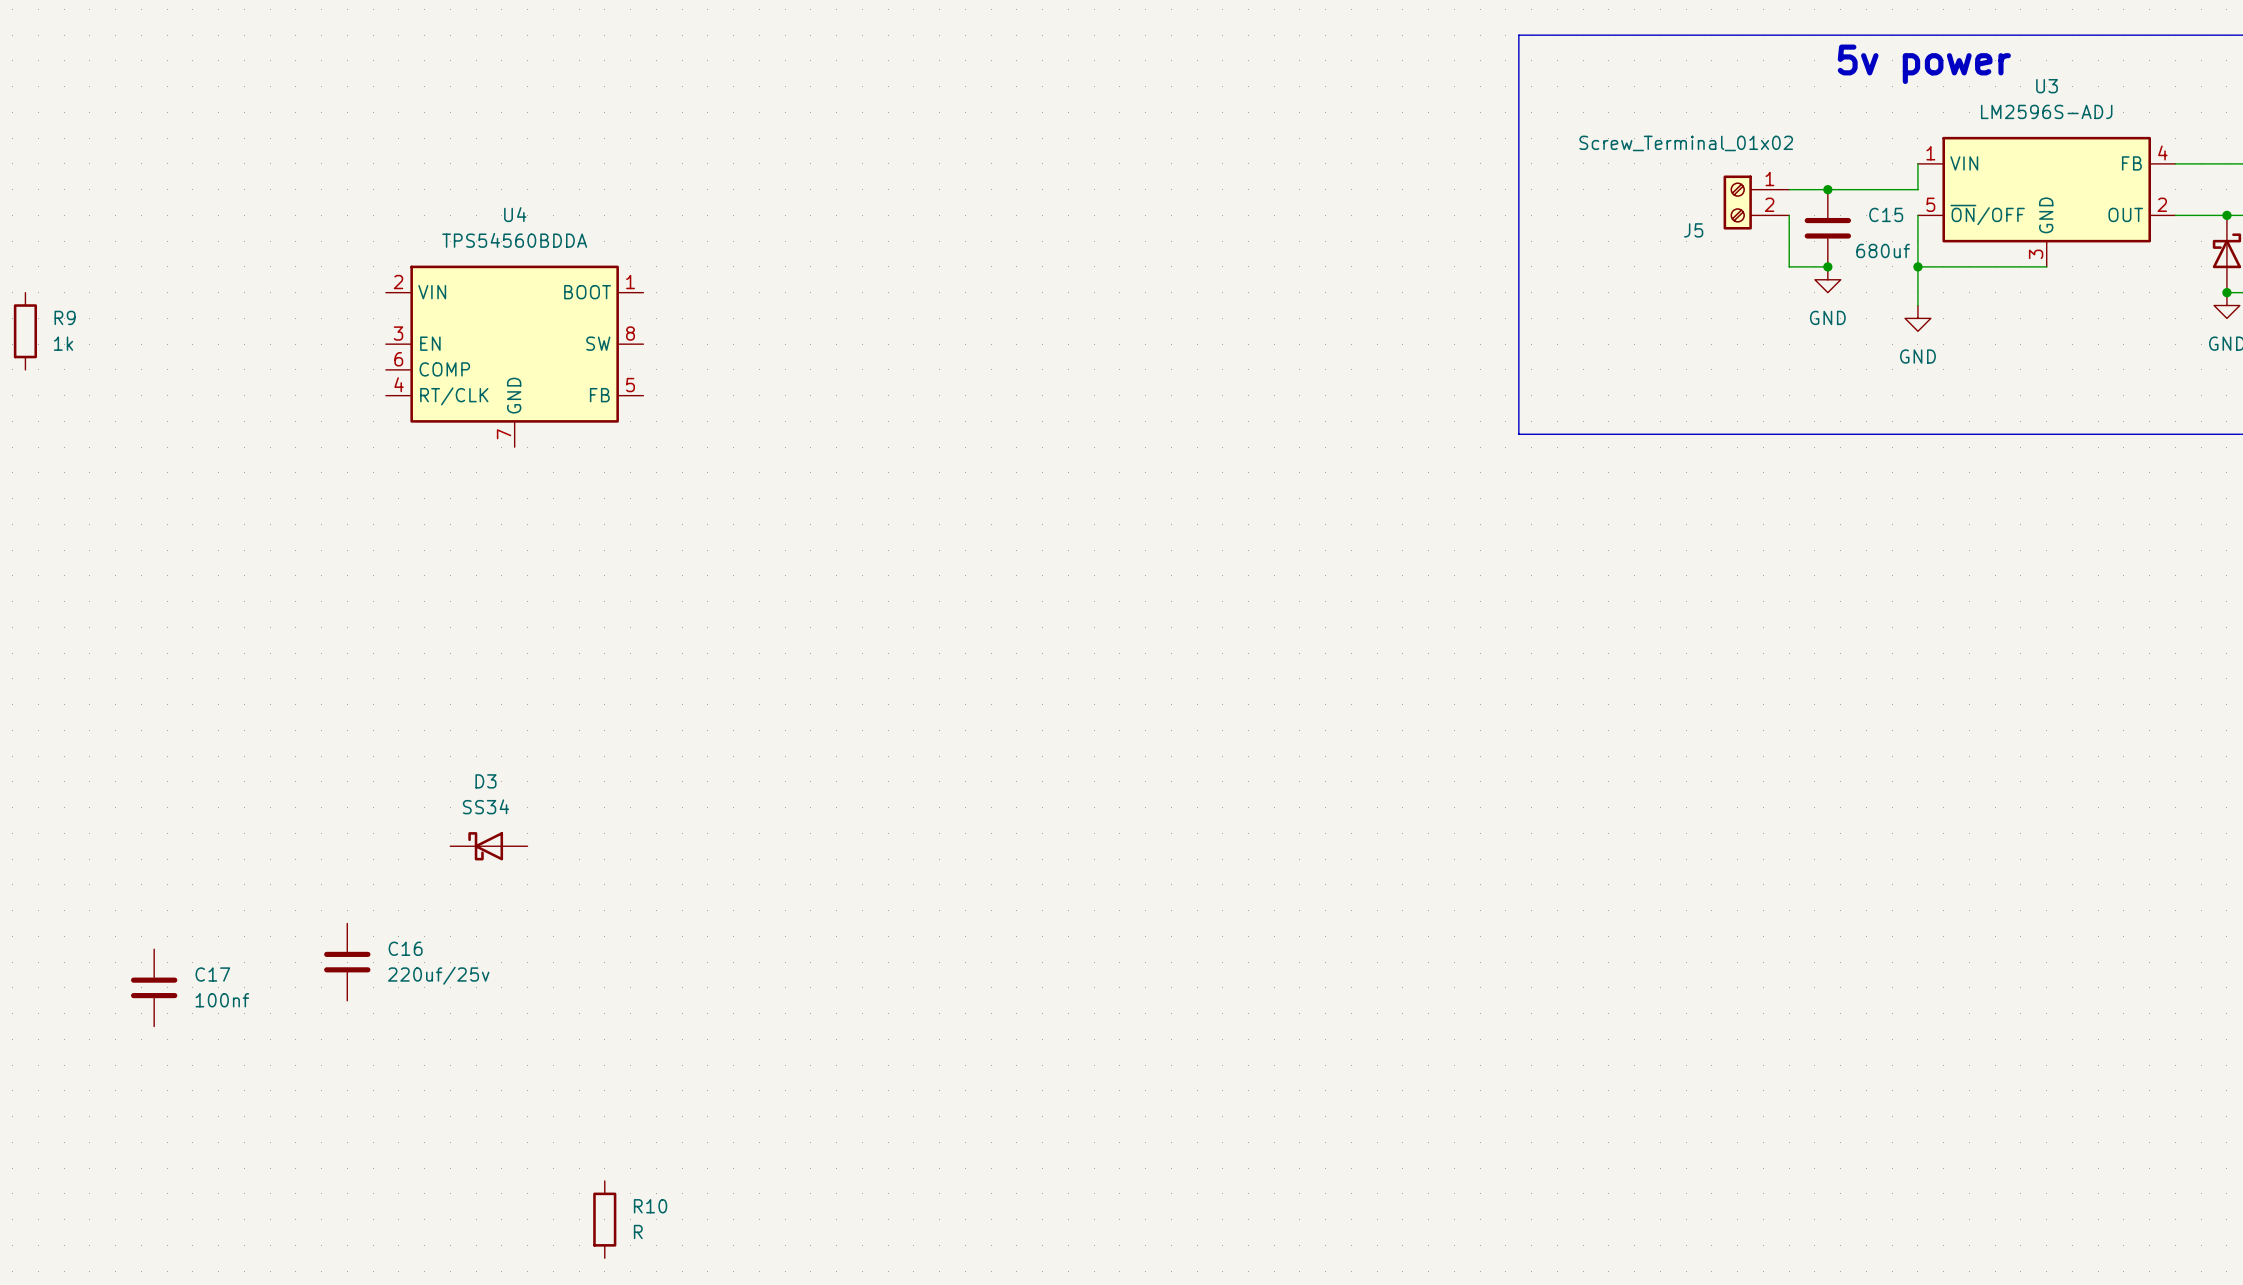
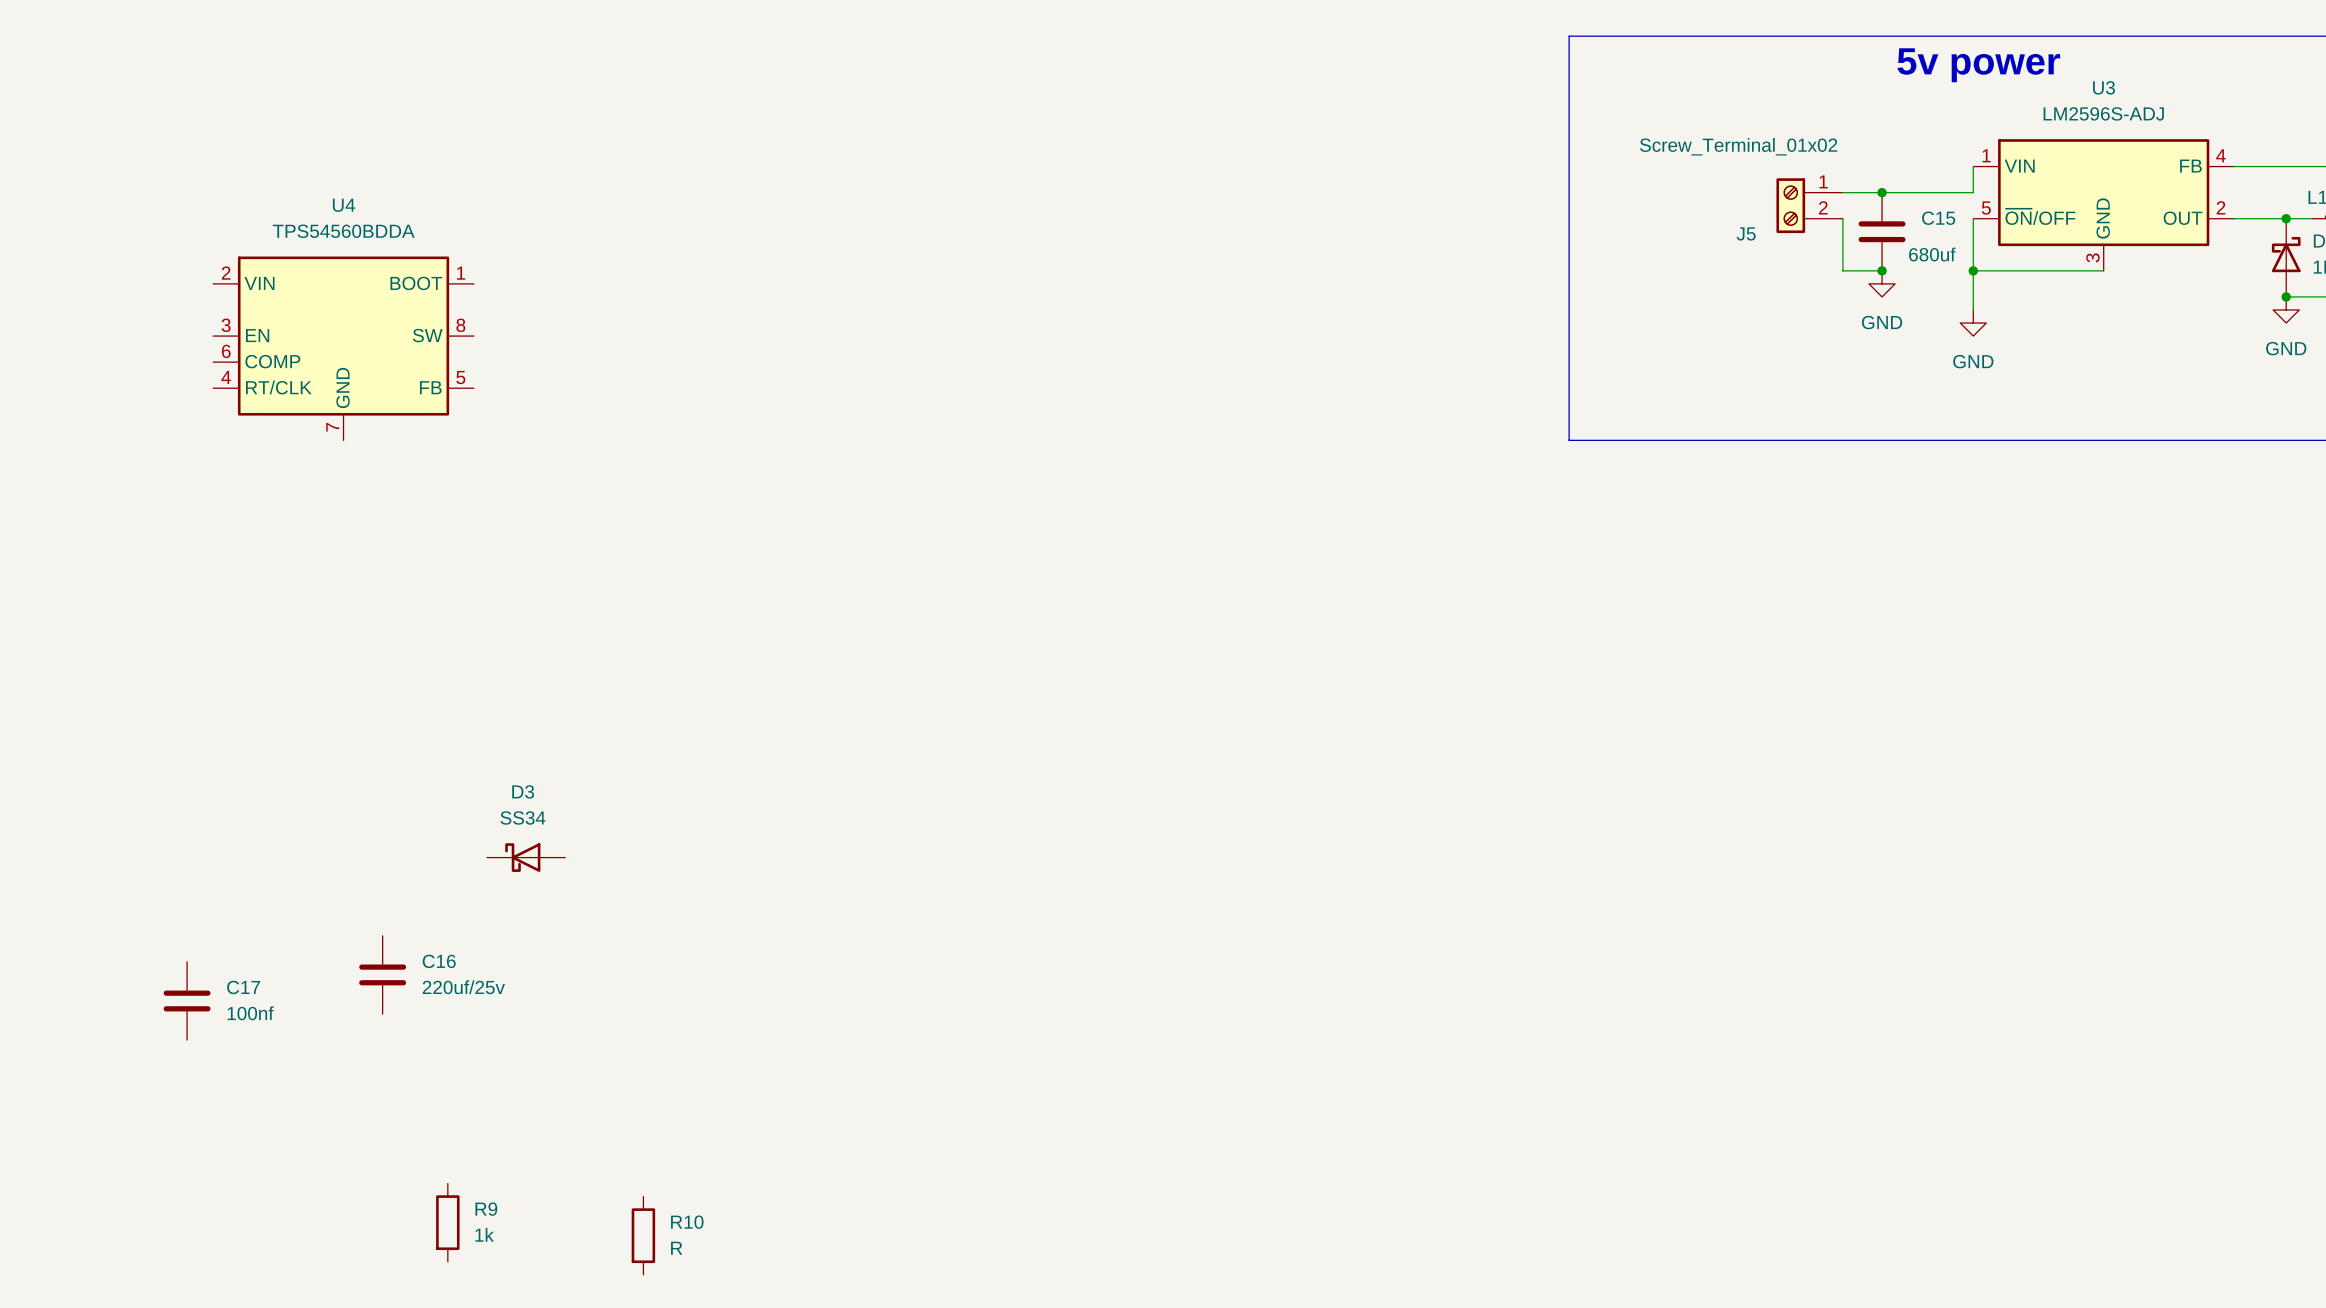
R9 position: (25, 331) -> (447, 1222)
U4 position: (514, 356) -> (343, 348)

